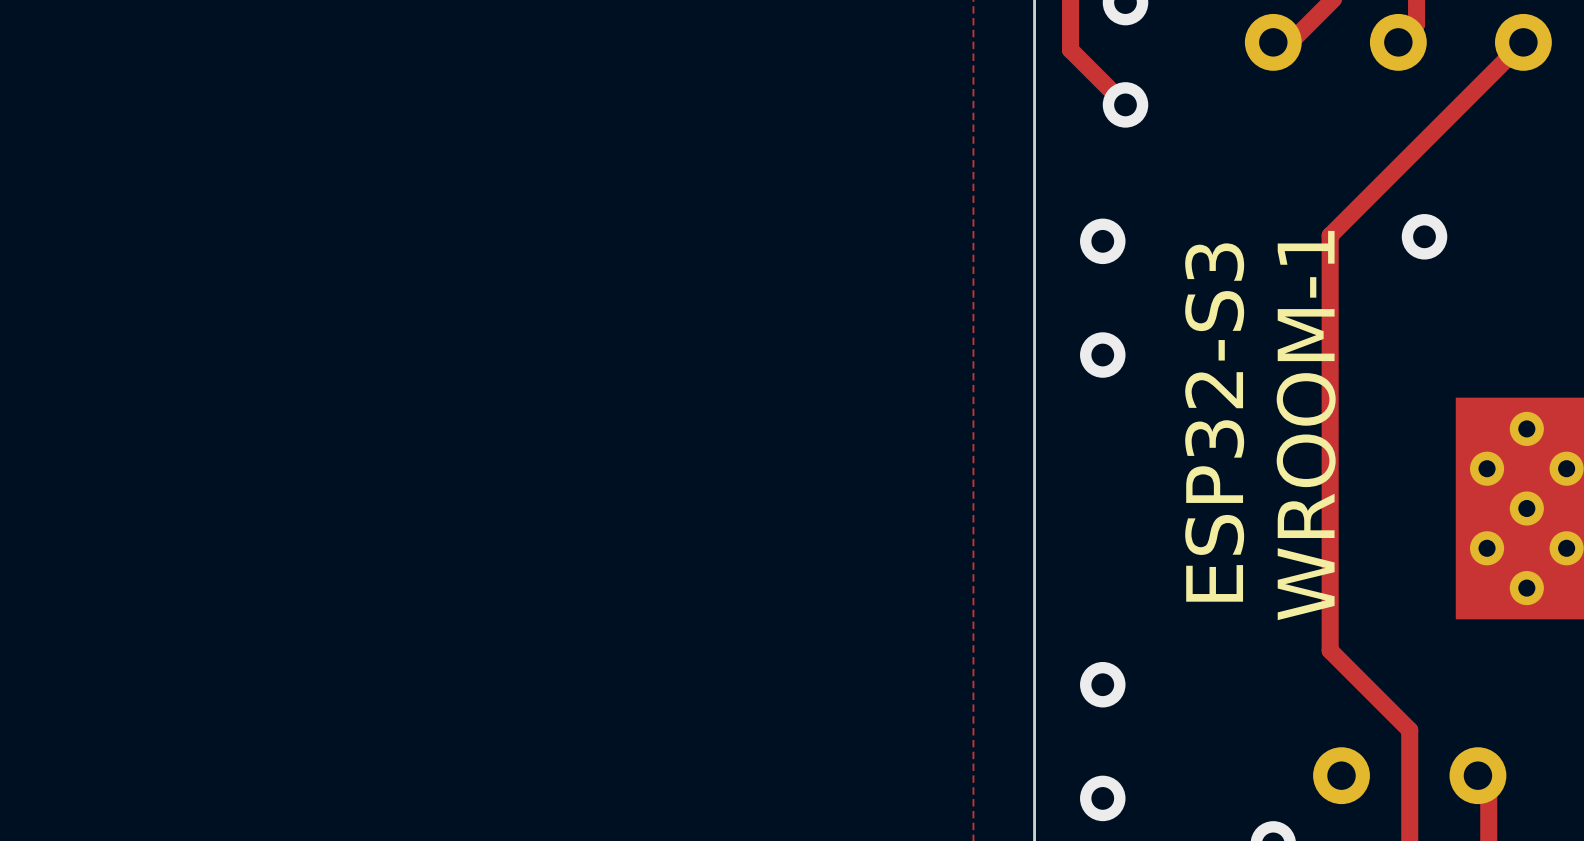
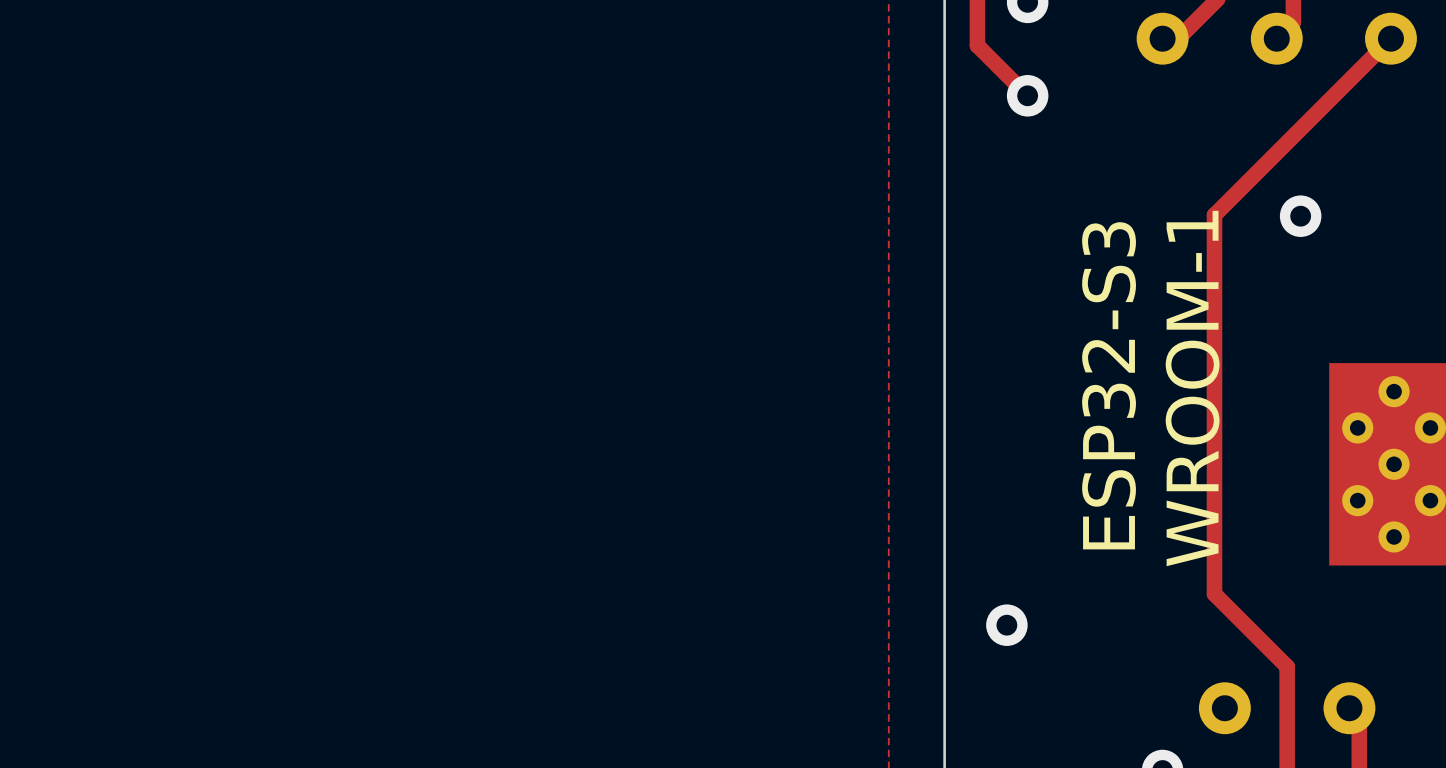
via: (1102, 241) -> none
via: (1102, 355) -> none
via: (1102, 798) -> none

